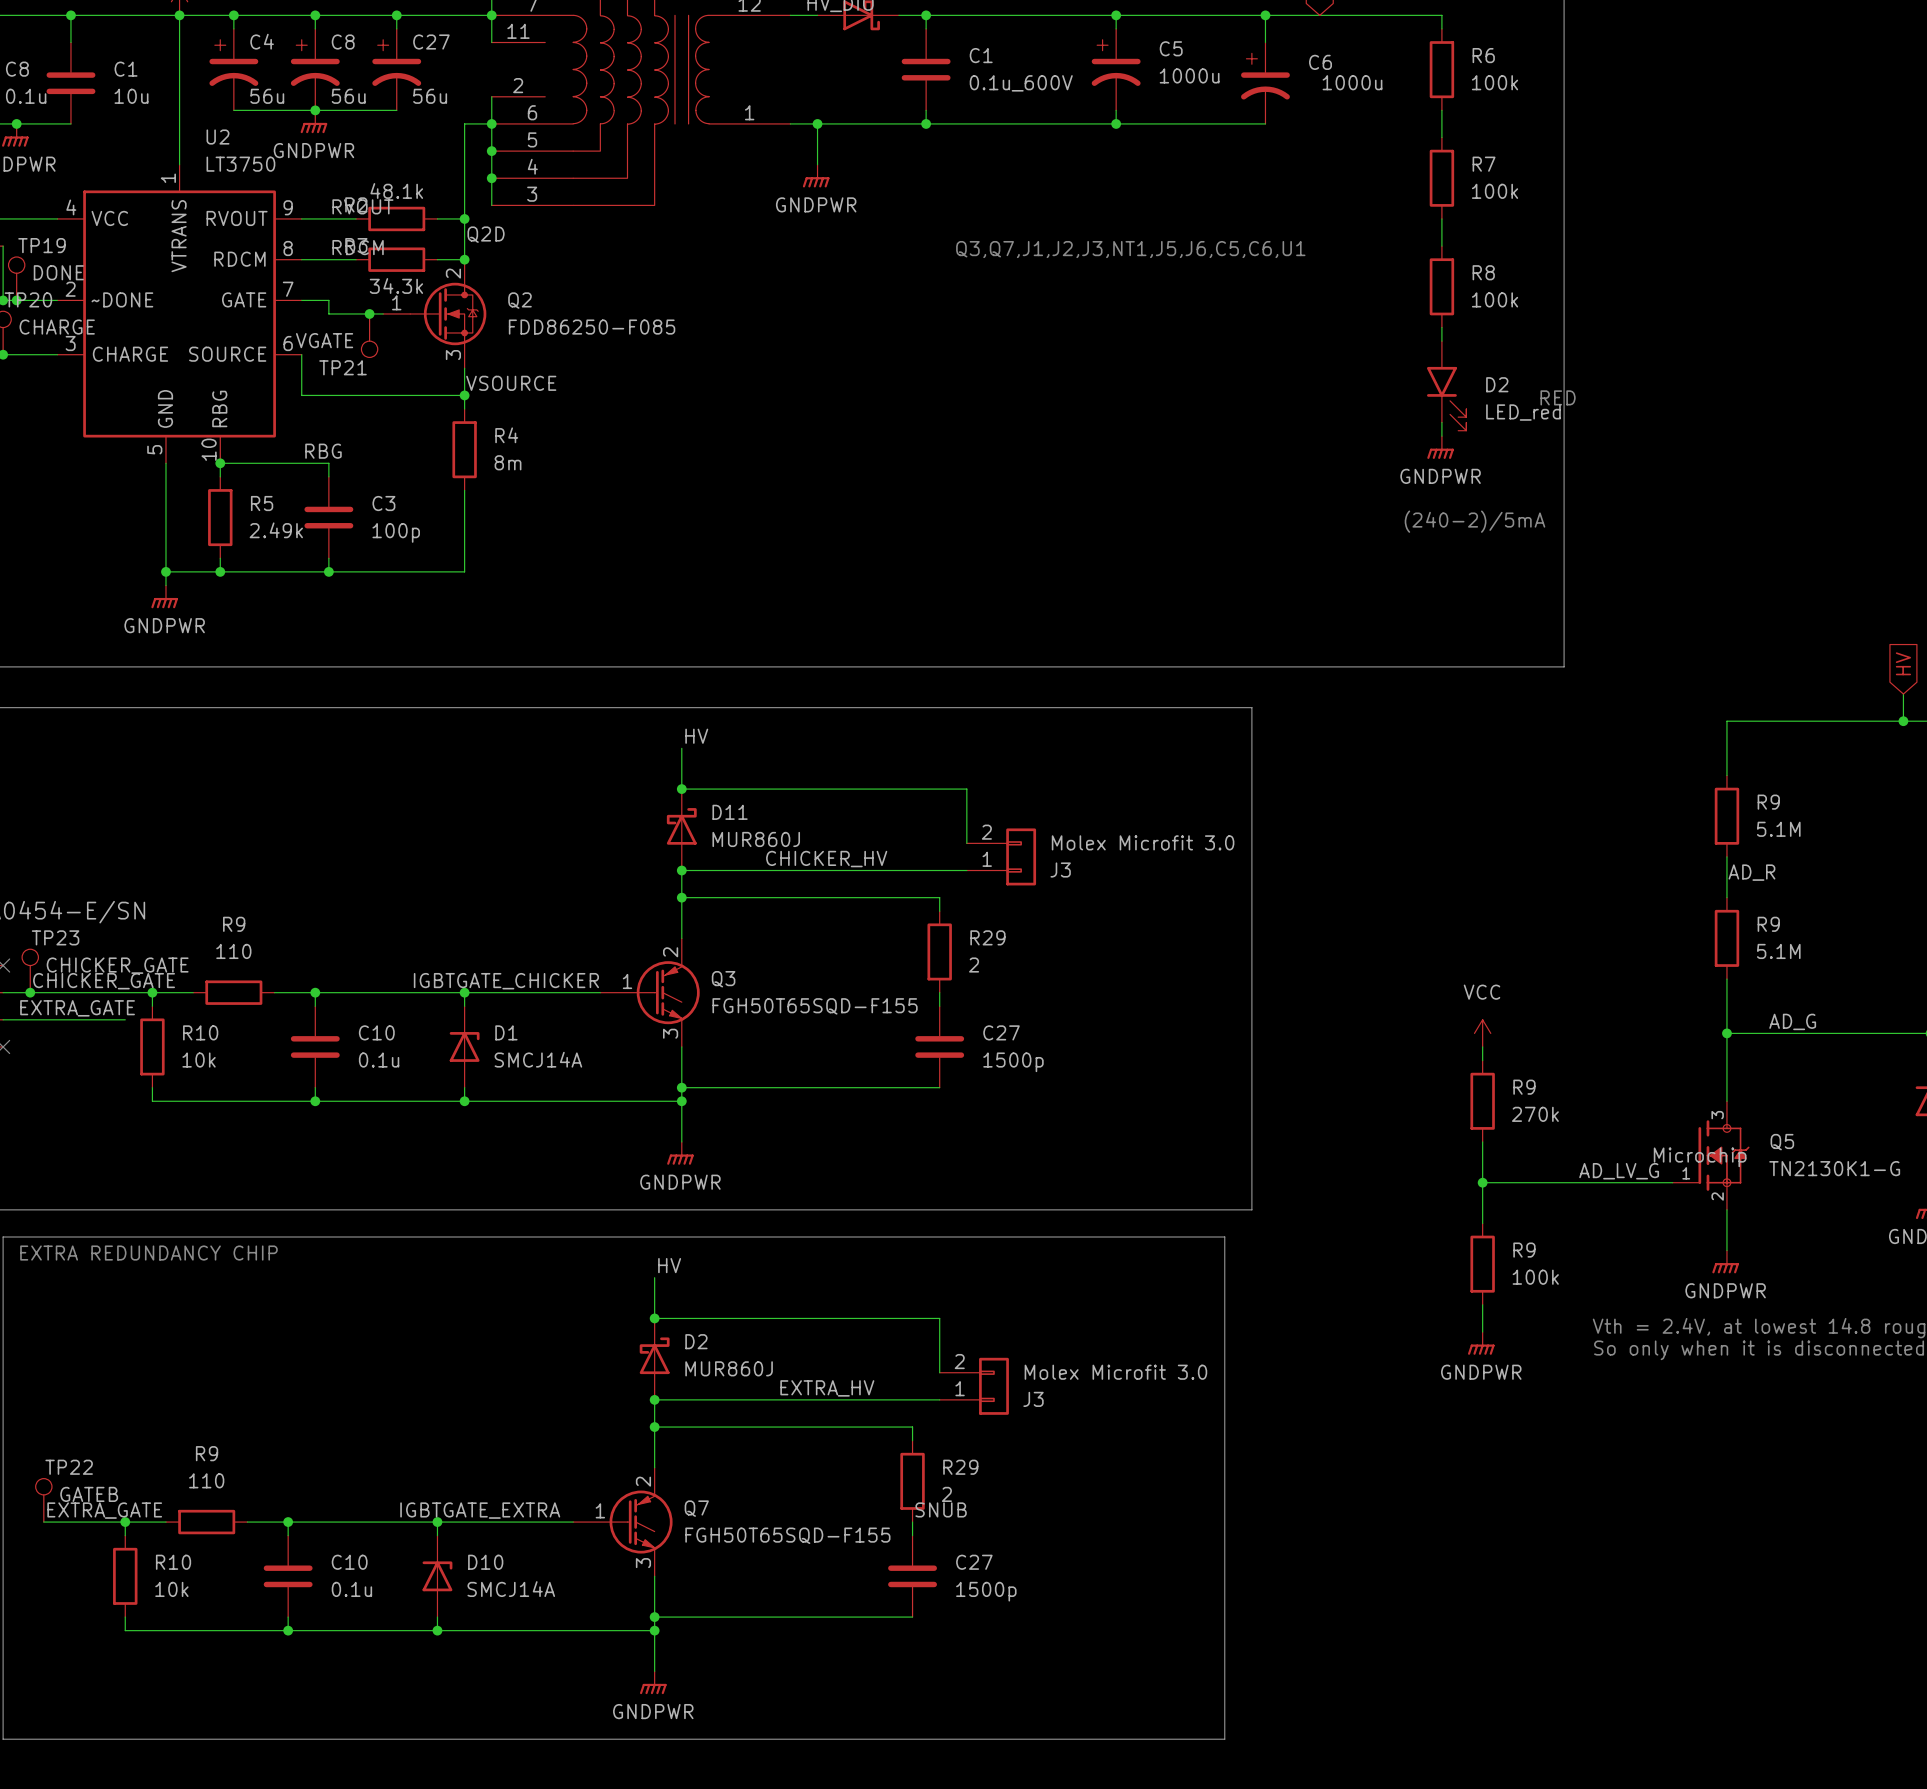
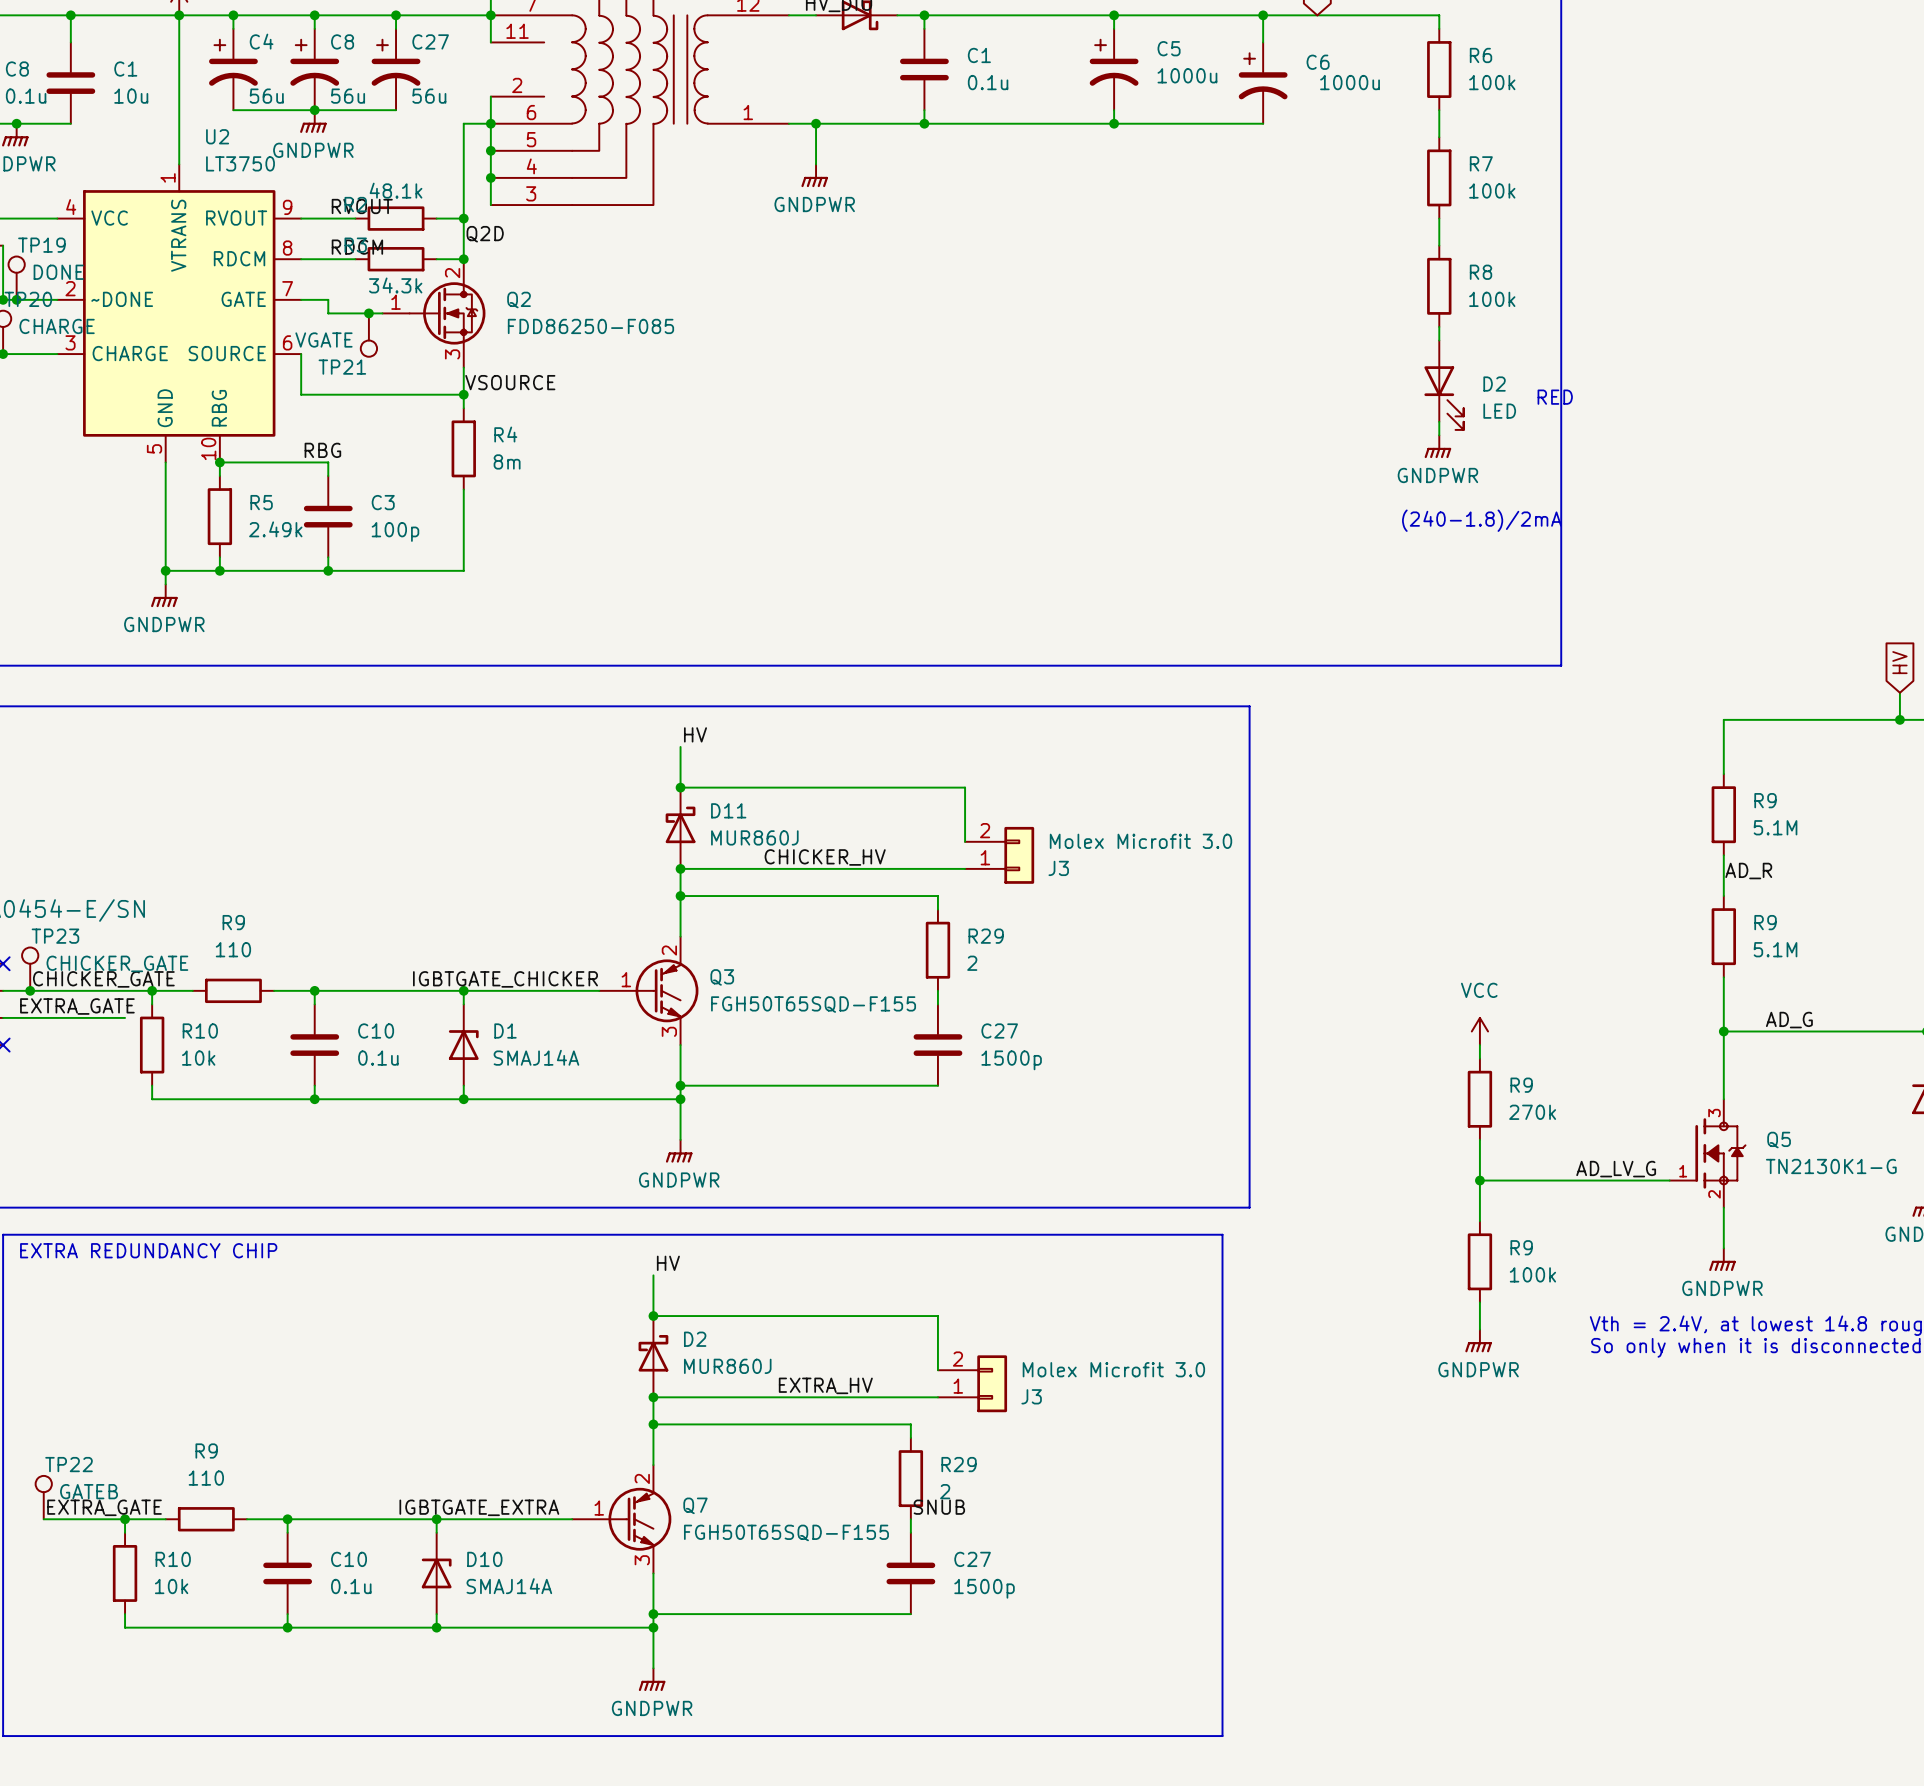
C1 value: 0.1u_600V (1021, 83) -> 0.1u (988, 82)
text: Q3,Q7,J1,J2,J3,NT1,J5,J6,C5,C6,U1 (1130, 249) -> none
D2 symbol: [1426, 341, 1467, 431] -> [1424, 340, 1464, 430]
D2 value: LED_red (1523, 412) -> LED (1499, 411)
text: (240-2)/5mA (1474, 521) -> (240-1.8)/2mA (1481, 520)
D1 value: SMCJ14A (538, 1059) -> SMAJ14A (536, 1057)
Q5 text: Microchip (1700, 1157) -> none
D10 value: SMCJ14A (511, 1589) -> SMAJ14A (509, 1586)

